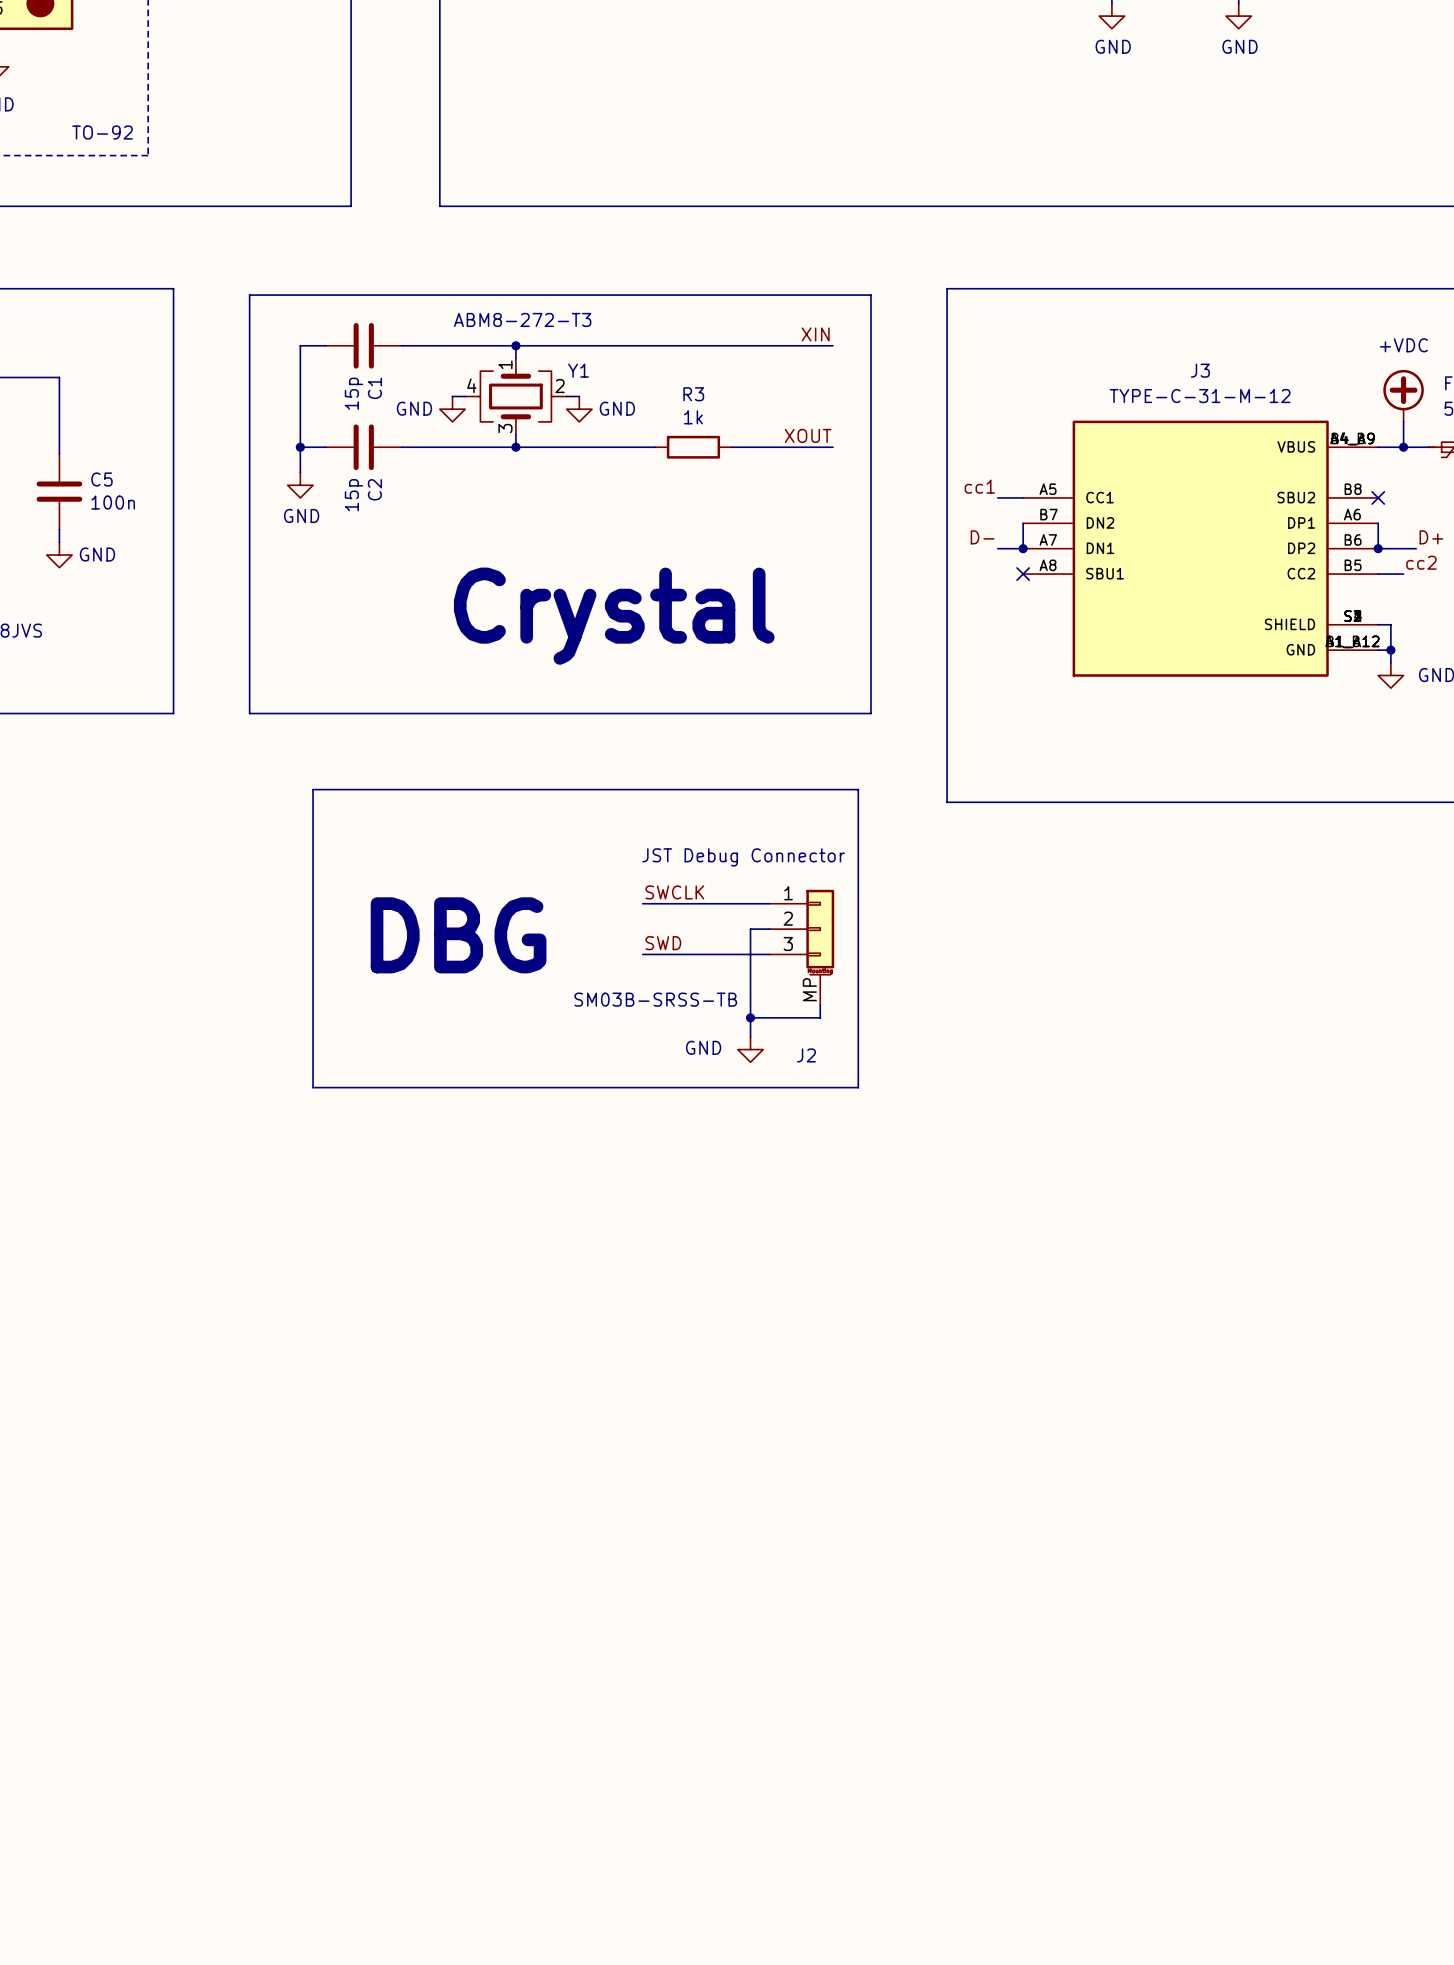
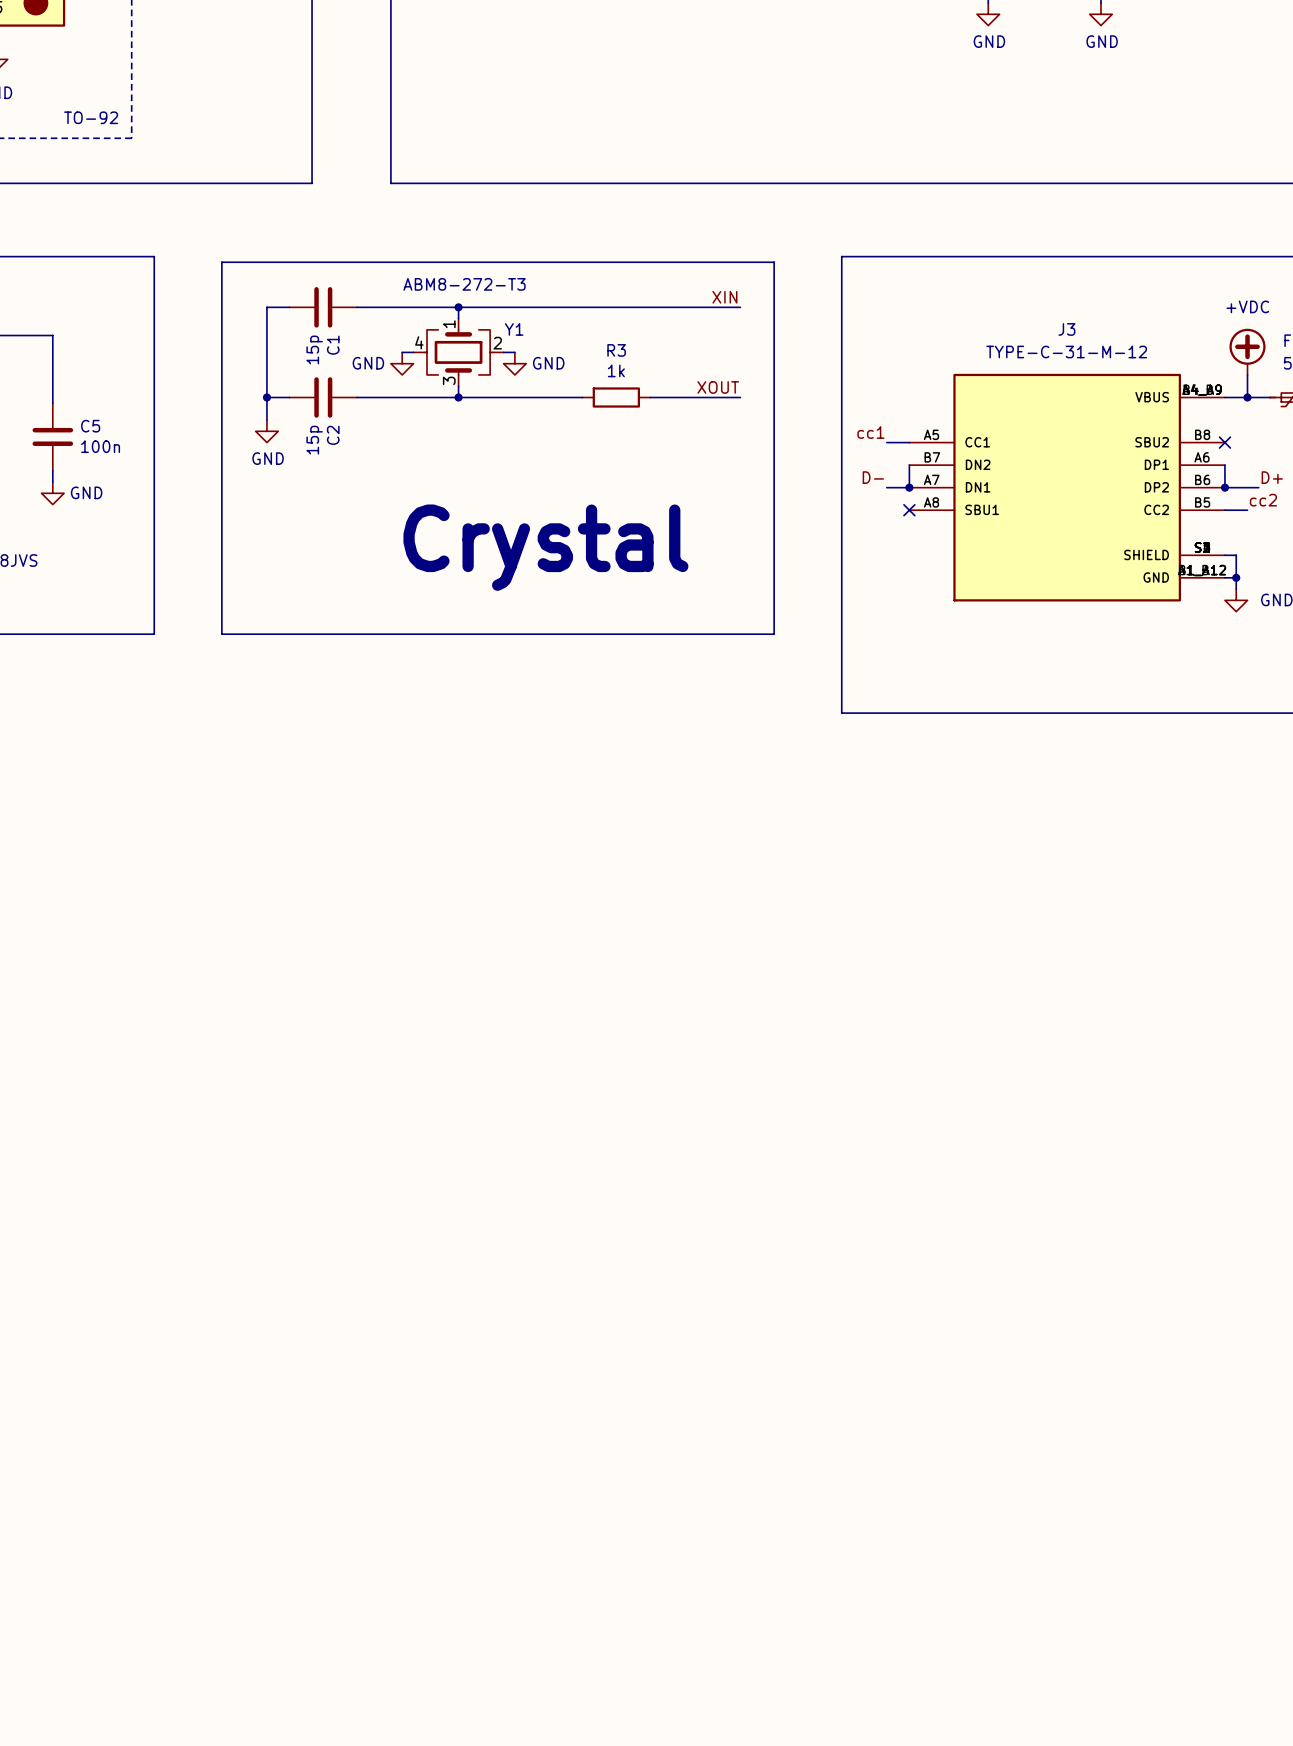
line: (313, 789) (313, 1087) (858, 1087) (858, 789) (313, 789) -> none
text: JST Debug Connector (743, 857) -> none
label: SWCLK (674, 892) -> none
wire: (642, 903) (769, 903) -> none
wire: (769, 929) (750, 929) (750, 1036) -> none
text: DBG (458, 935) -> none
label: SWD (663, 943) -> none
J2: SM03B-SRSS-TB (801, 947) -> none
wire: (642, 954) (769, 954) -> none
wire: (820, 1005) (820, 1017) (750, 1017) -> none
junction: (750, 1017) -> none
power symbol: GND (750, 1049) -> none

